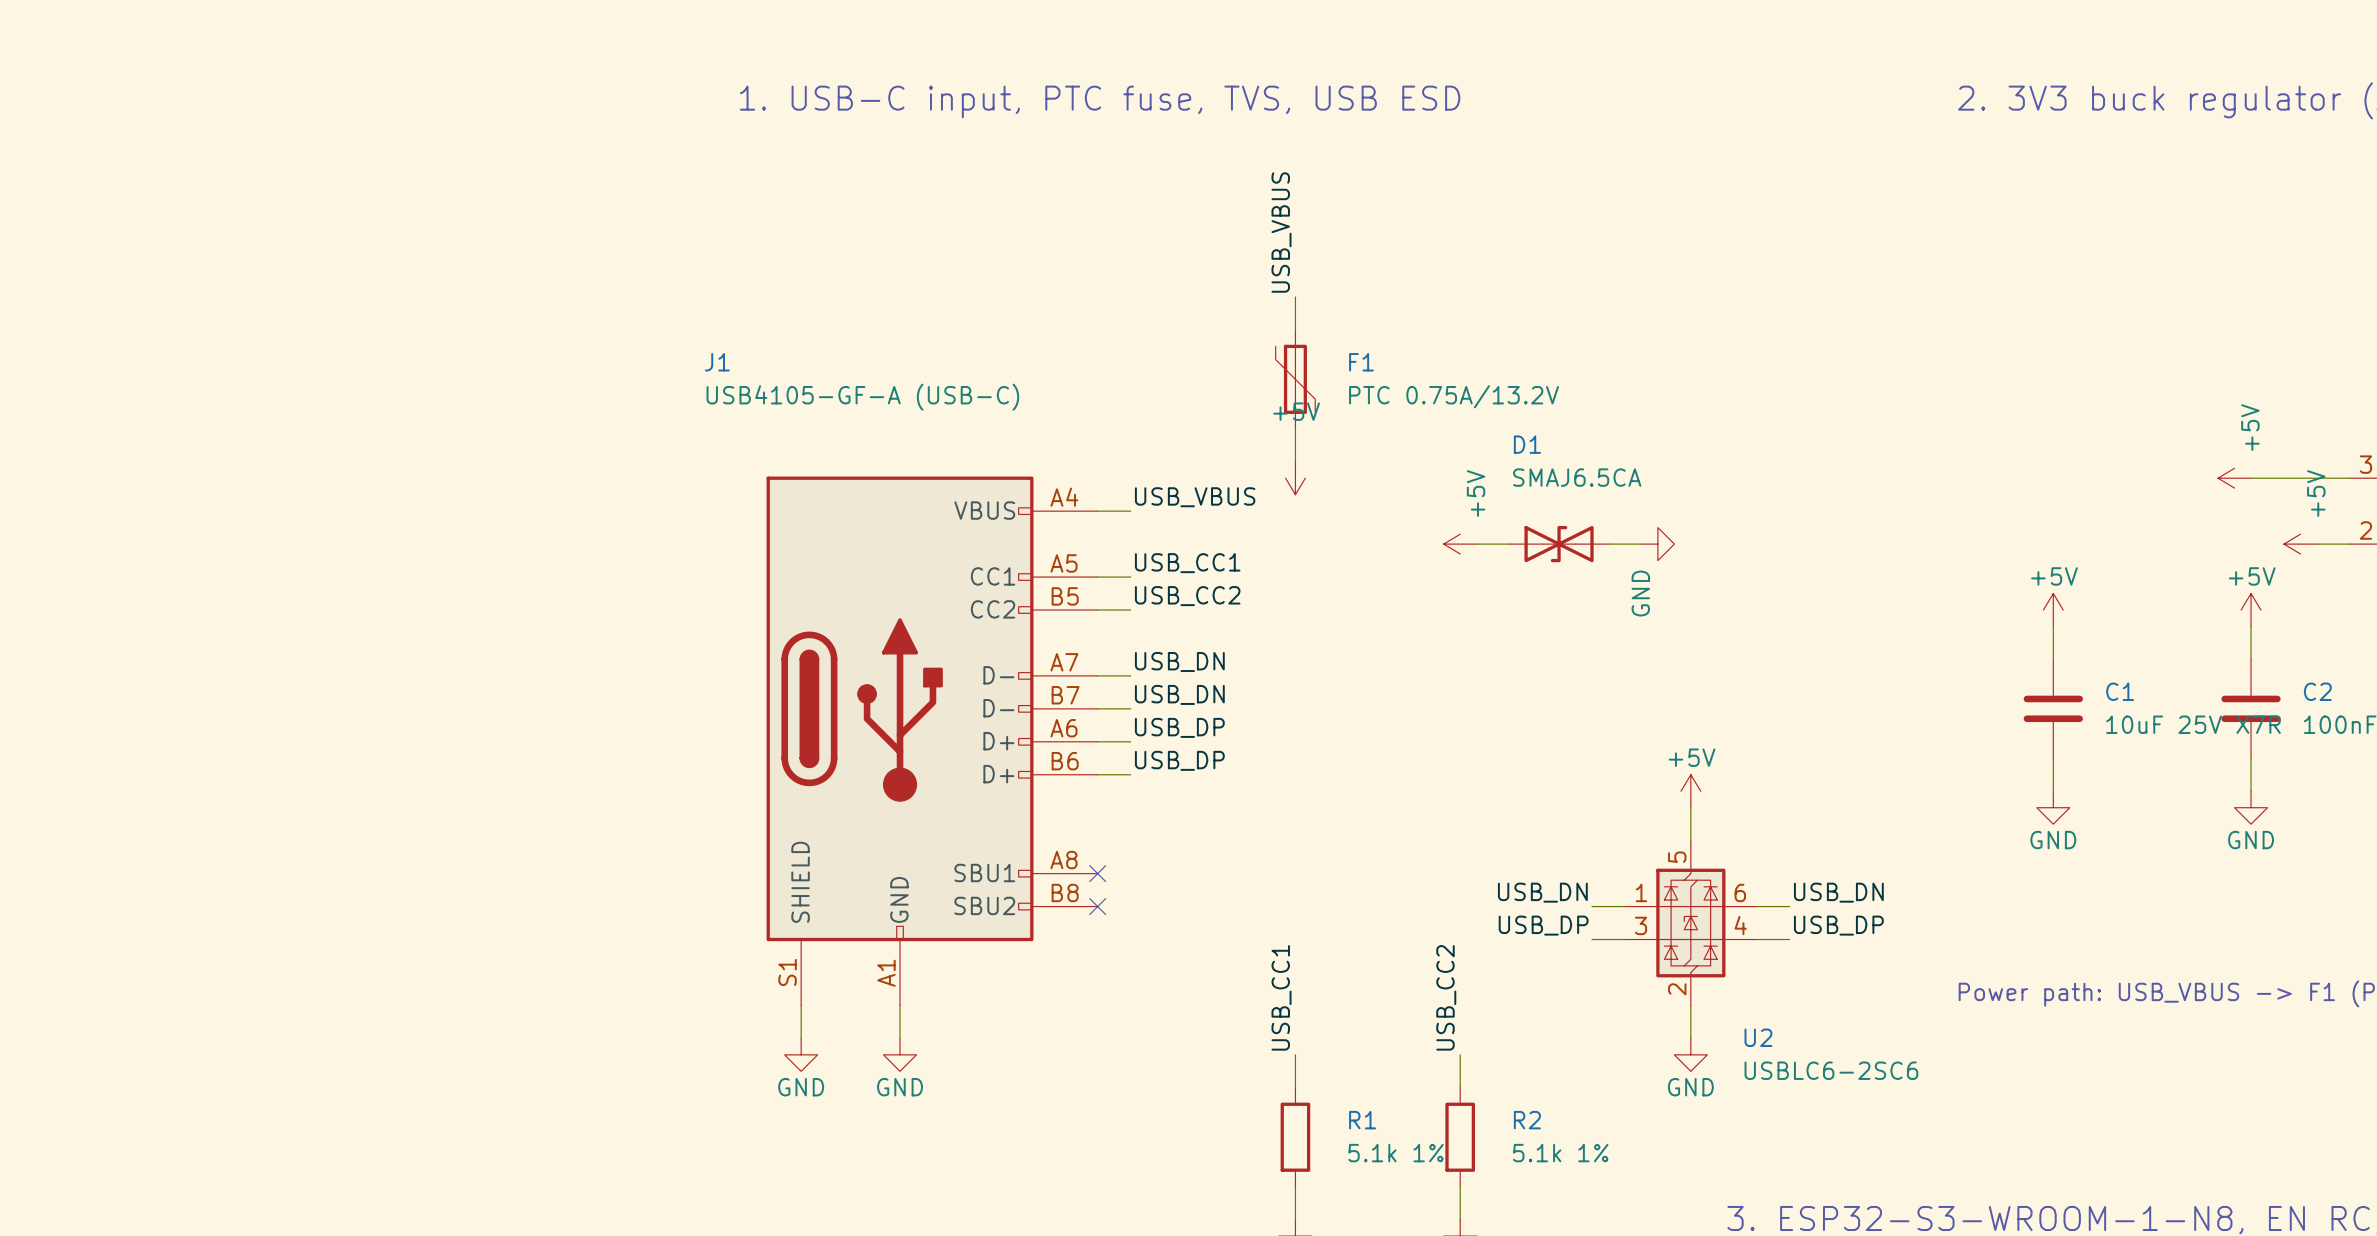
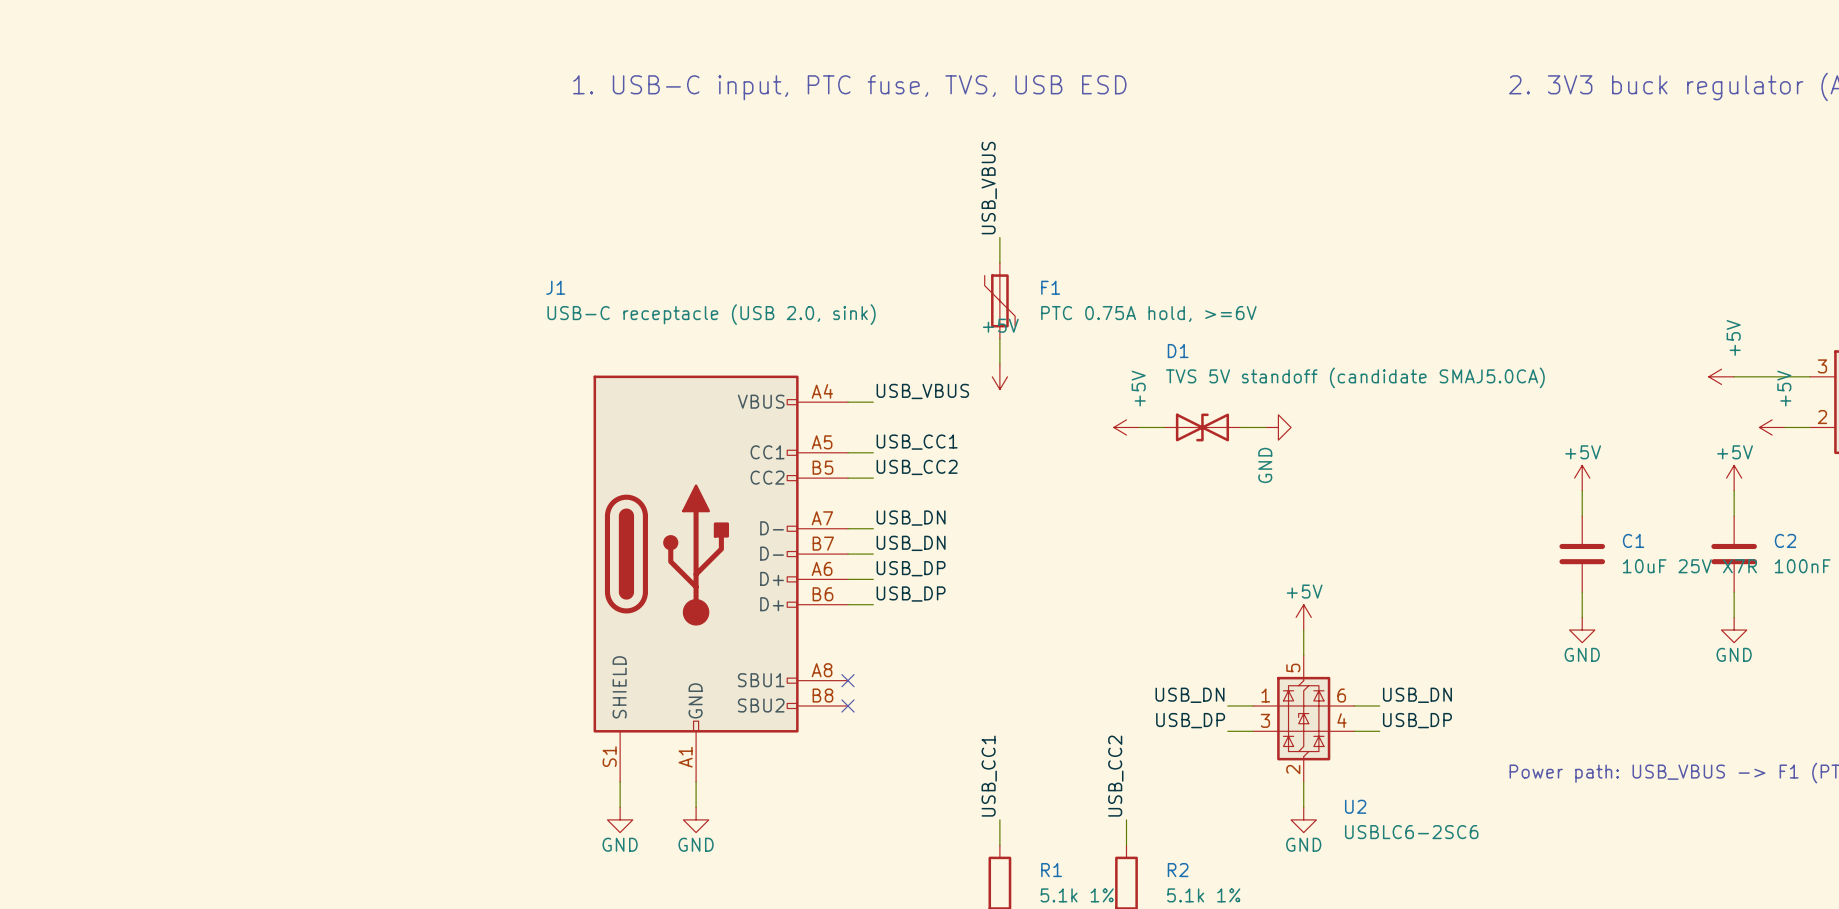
F1 value: PTC 0.75A/13.2V (1454, 396) -> PTC 0.75A hold, >=6V (1148, 313)
J1 value: USB4105-GF-A (USB-C) (862, 397) -> USB-C receptacle (USB 2.0, sink) (711, 314)
D1 value: SMAJ6.5CA (1577, 477) -> TVS 5V standoff (candidate SMAJ5.0CA) (1355, 377)

